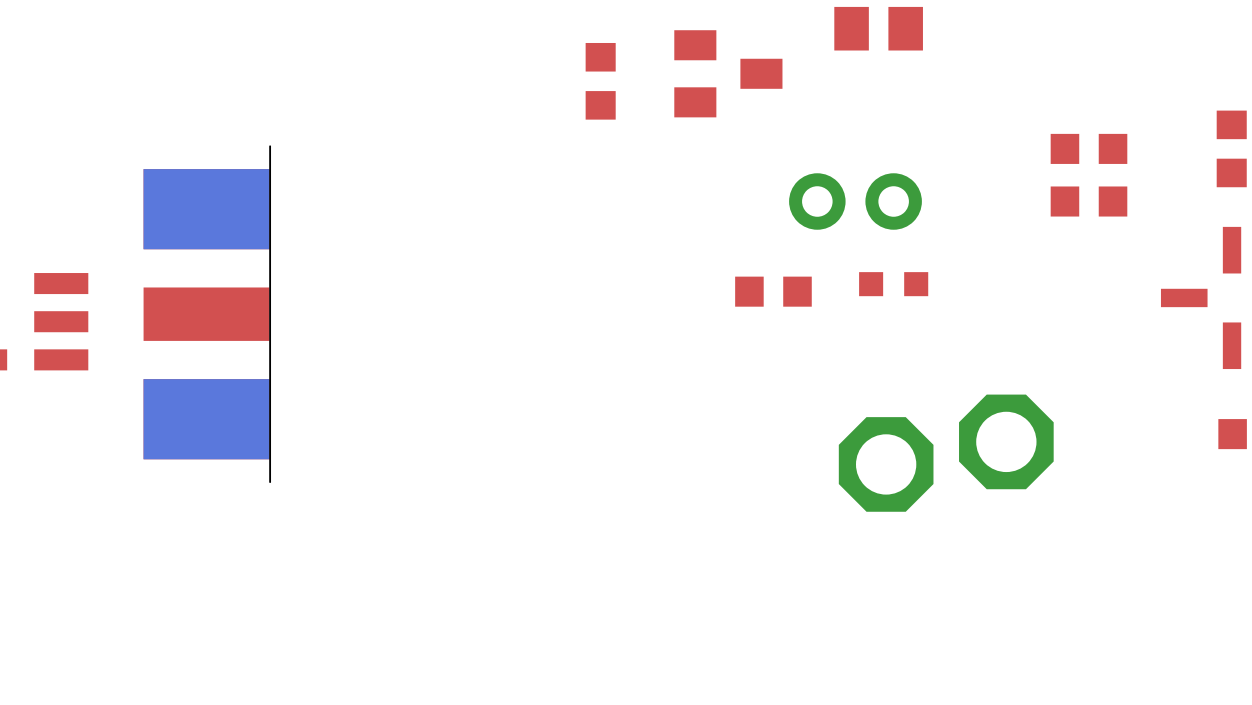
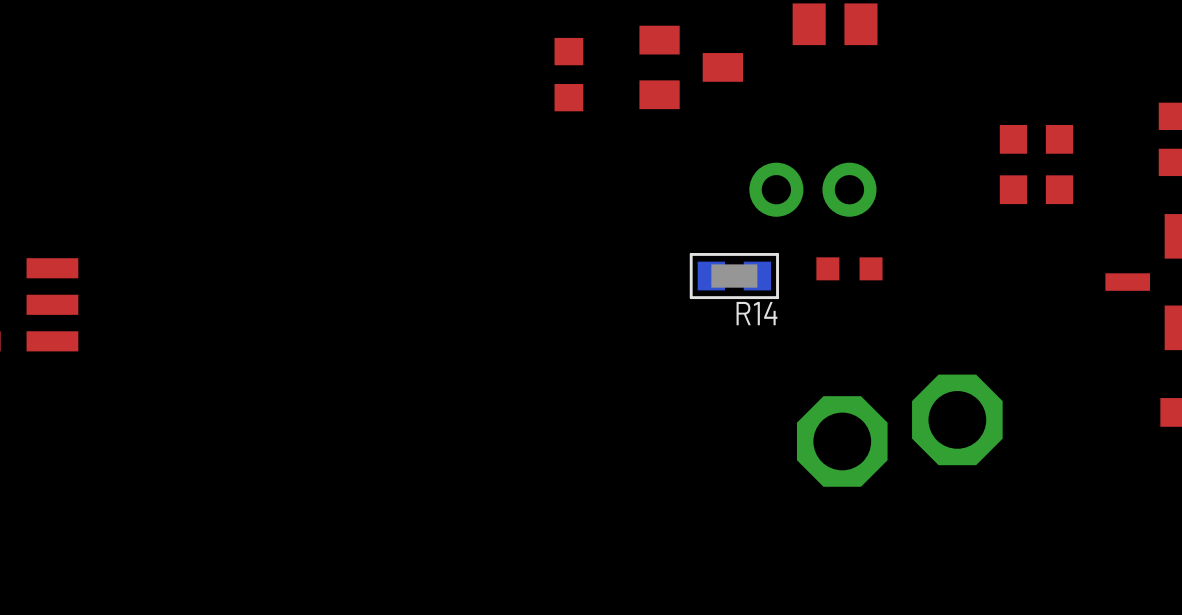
R14 side: top (773, 291) -> bottom (734, 276)
part: (206, 314) -> none

